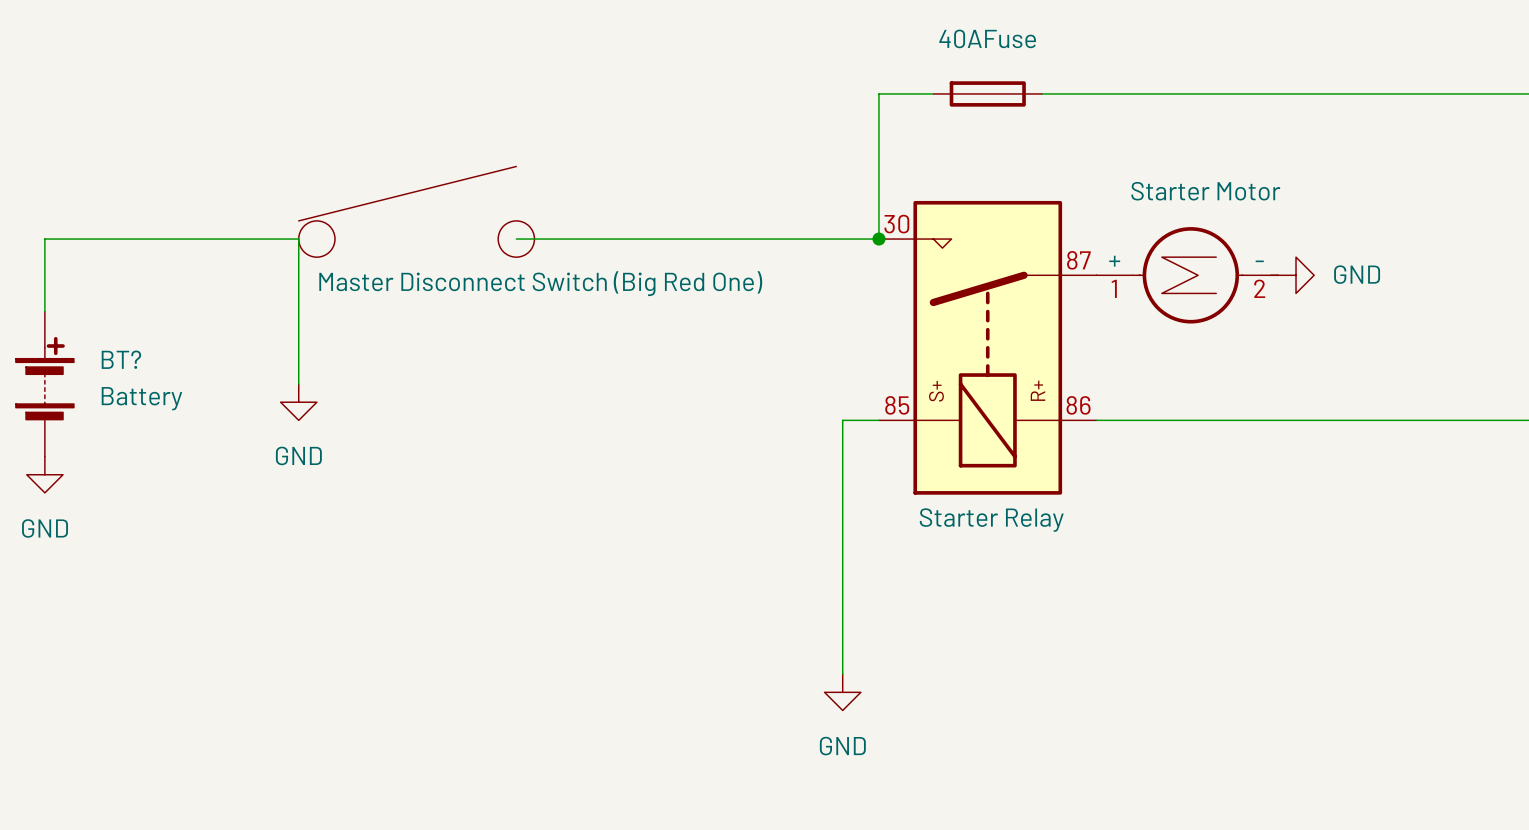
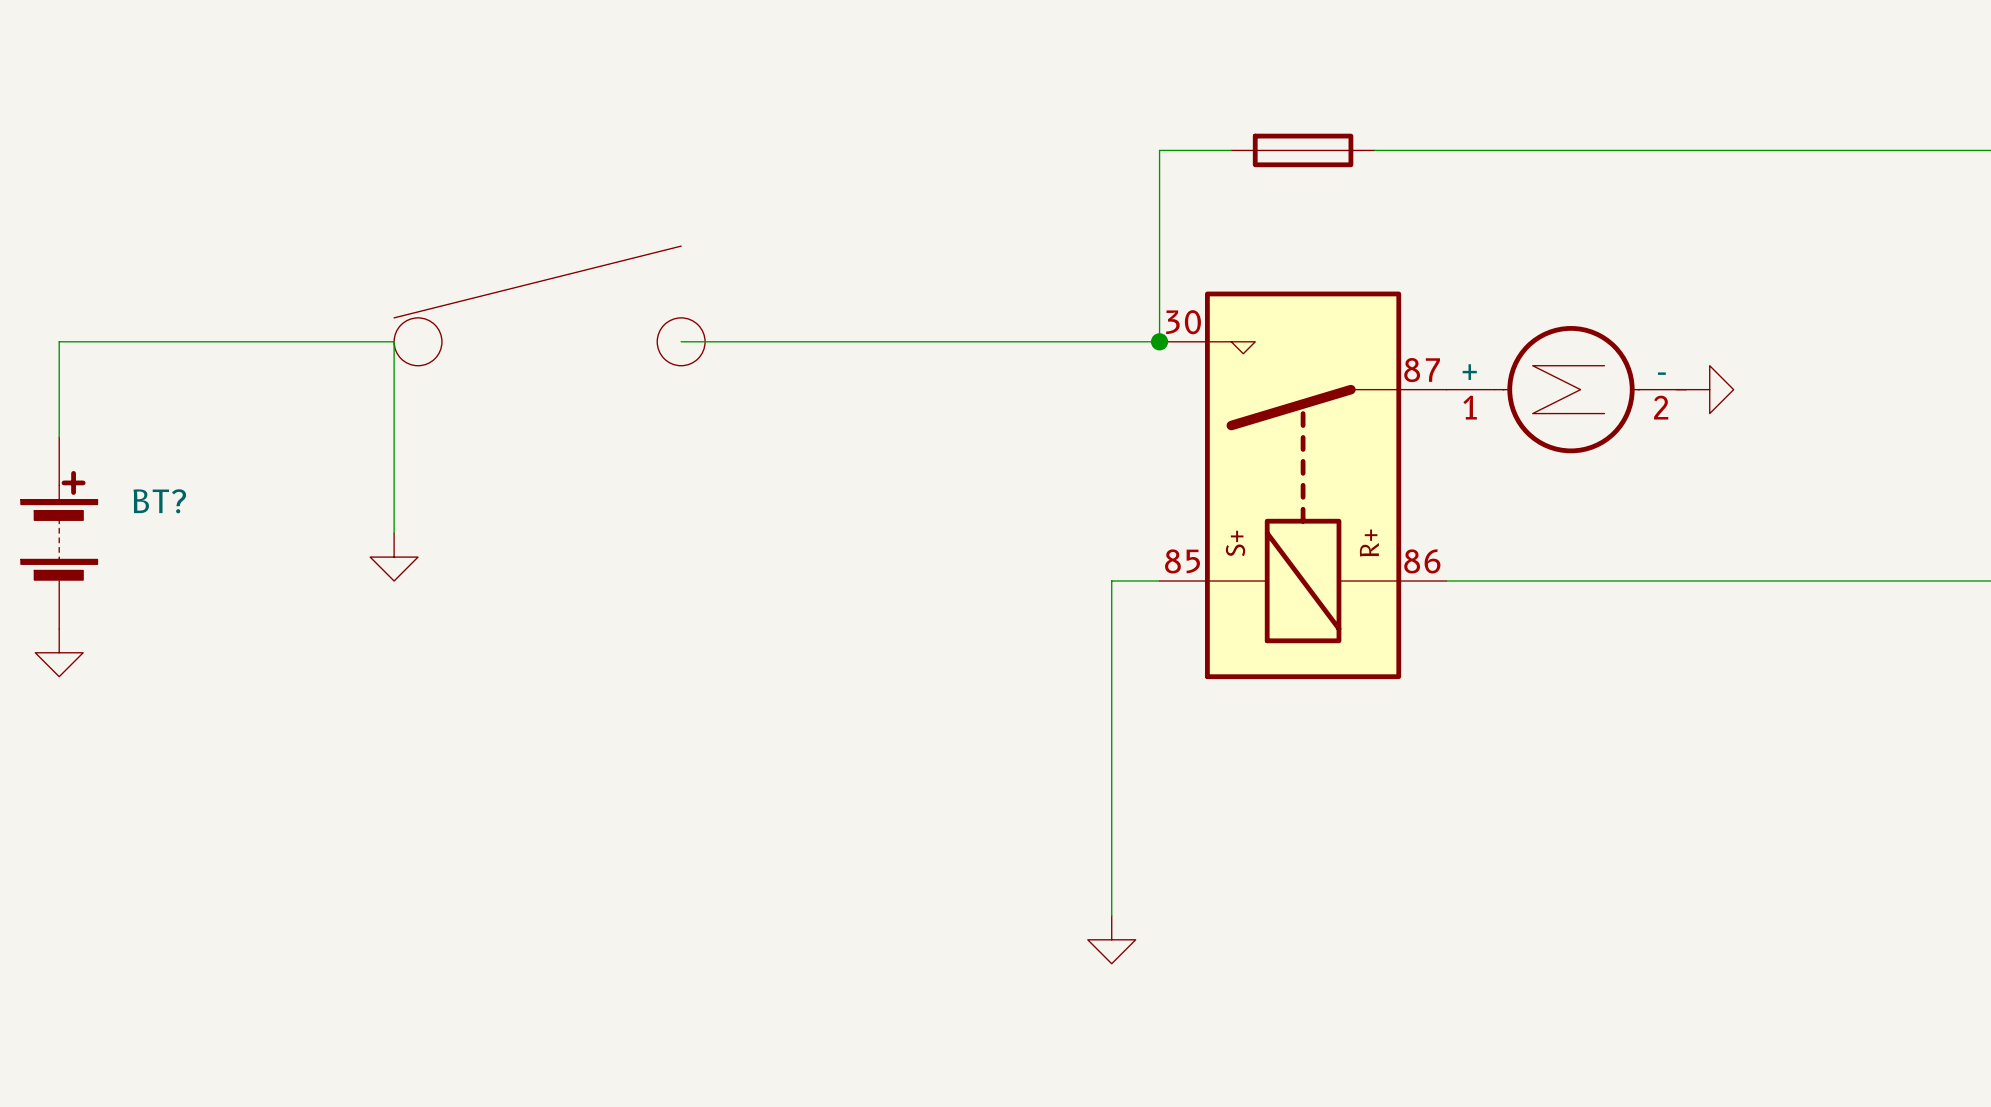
part value: 40AFuse (987, 38) -> none
part value: Starter Motor (1205, 191) -> none
power symbol text: GND (1357, 274) -> none
part value: Master Disconnect Switch (Big Red One) (540, 283) -> none
BT? value: Battery (141, 398) -> none
power symbol text: GND (298, 455) -> none
part value: Starter Relay (991, 520) -> none
power symbol text: GND (45, 528) -> none
power symbol text: GND (842, 746) -> none

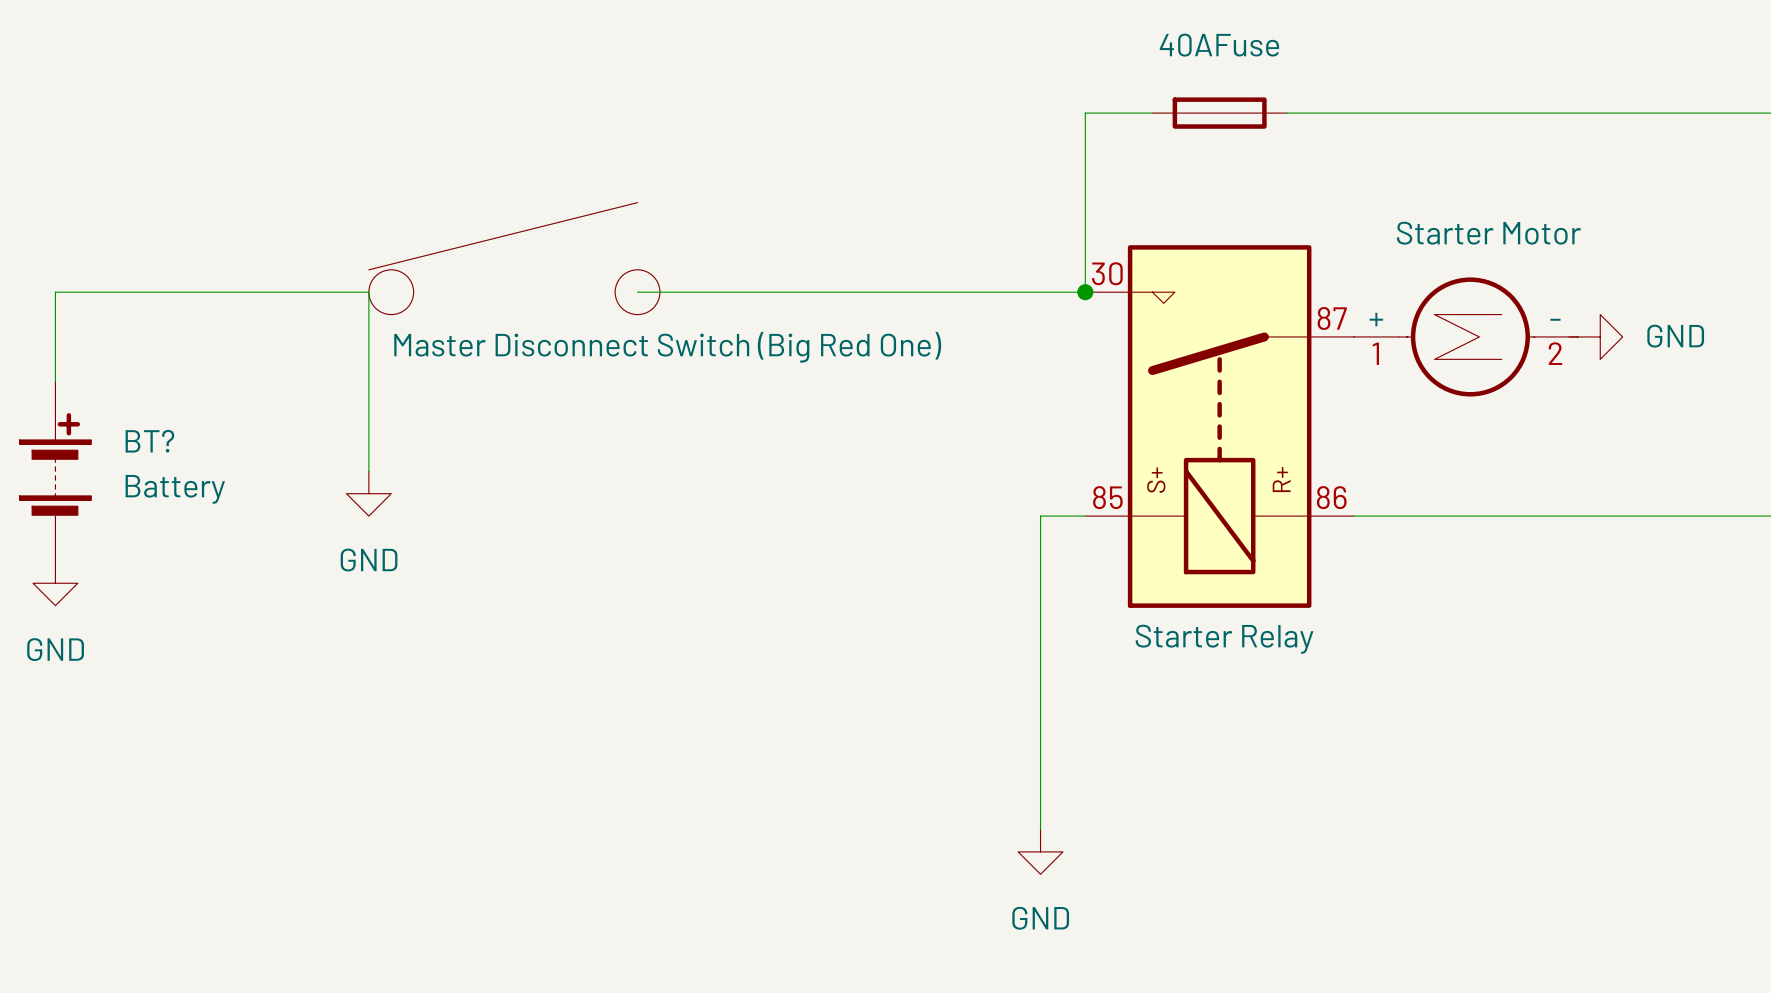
part value: none -> 40AFuse (1219, 45)
part value: none -> Starter Motor (1488, 233)
power symbol text: none -> GND (1675, 336)
part value: none -> Master Disconnect Switch (Big Red One) (667, 347)
BT? value: none -> Battery (175, 489)
power symbol text: none -> GND (369, 560)
part value: none -> Starter Relay (1224, 639)
power symbol text: none -> GND (55, 649)
power symbol text: none -> GND (1040, 918)

